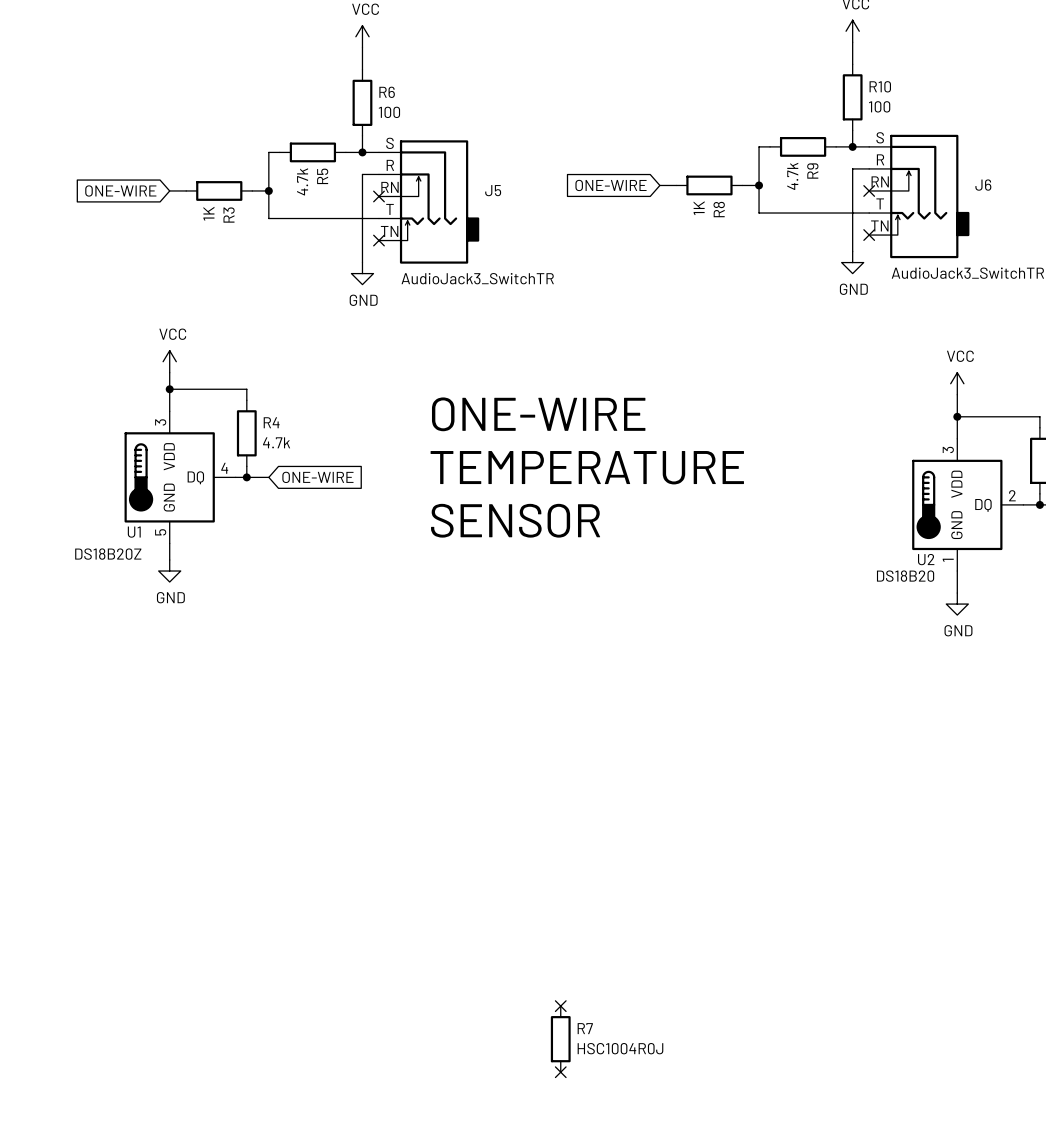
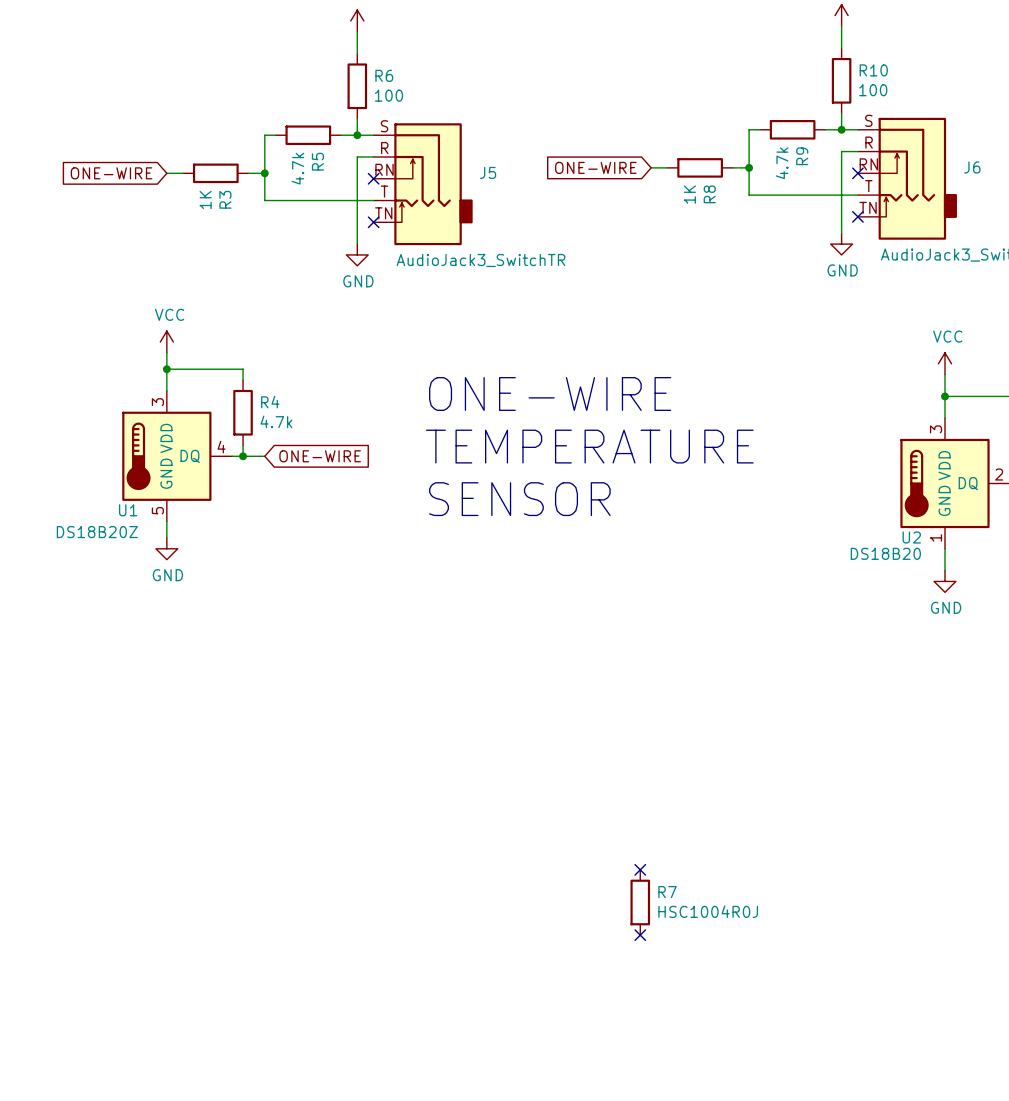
no-connect mark: none -> (640, 869)
no-connect mark: none -> (640, 935)
no-connect mark: (560, 1006) -> none
R7 position: (560, 1039) -> (640, 902)
no-connect mark: (560, 1072) -> none

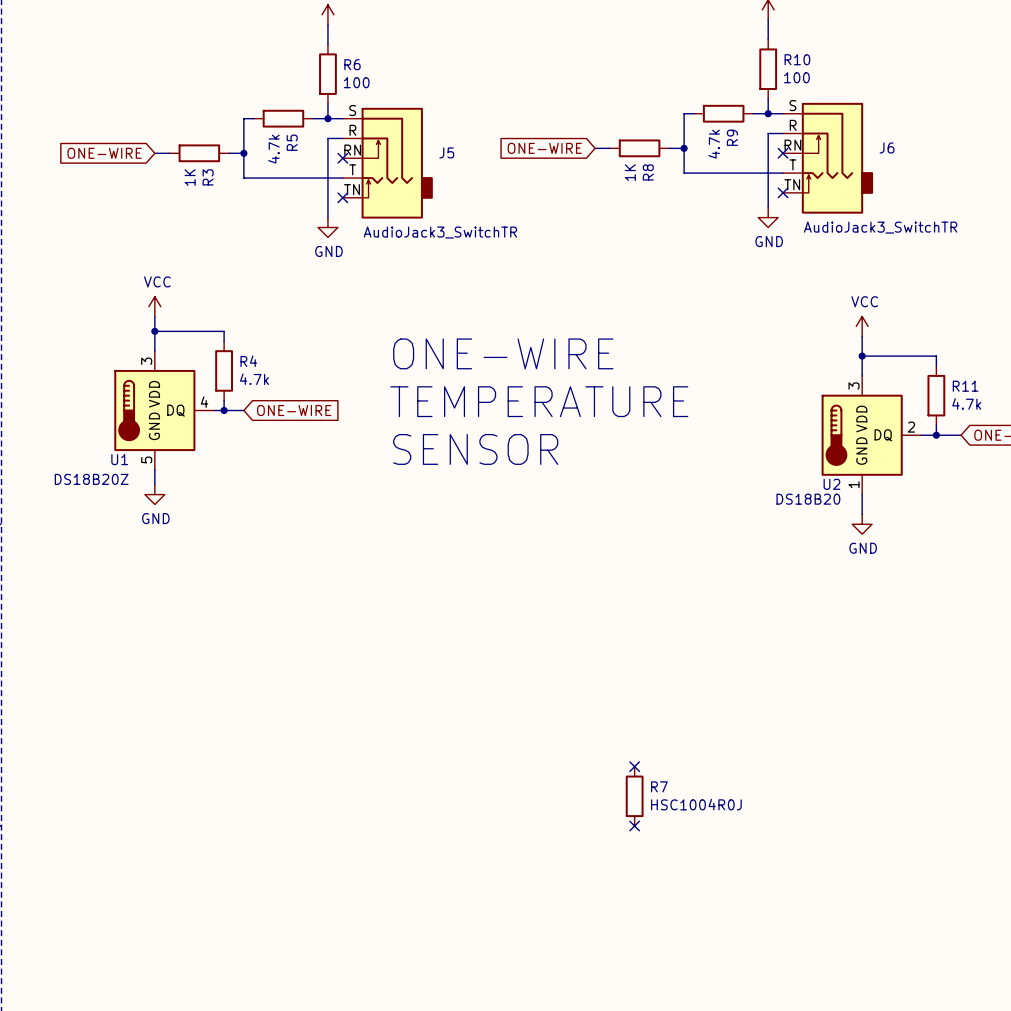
no-connect mark: none -> (634, 766)
no-connect mark: (640, 869) -> none
R7 position: (640, 902) -> (634, 796)
no-connect mark: none -> (634, 826)
no-connect mark: (640, 935) -> none

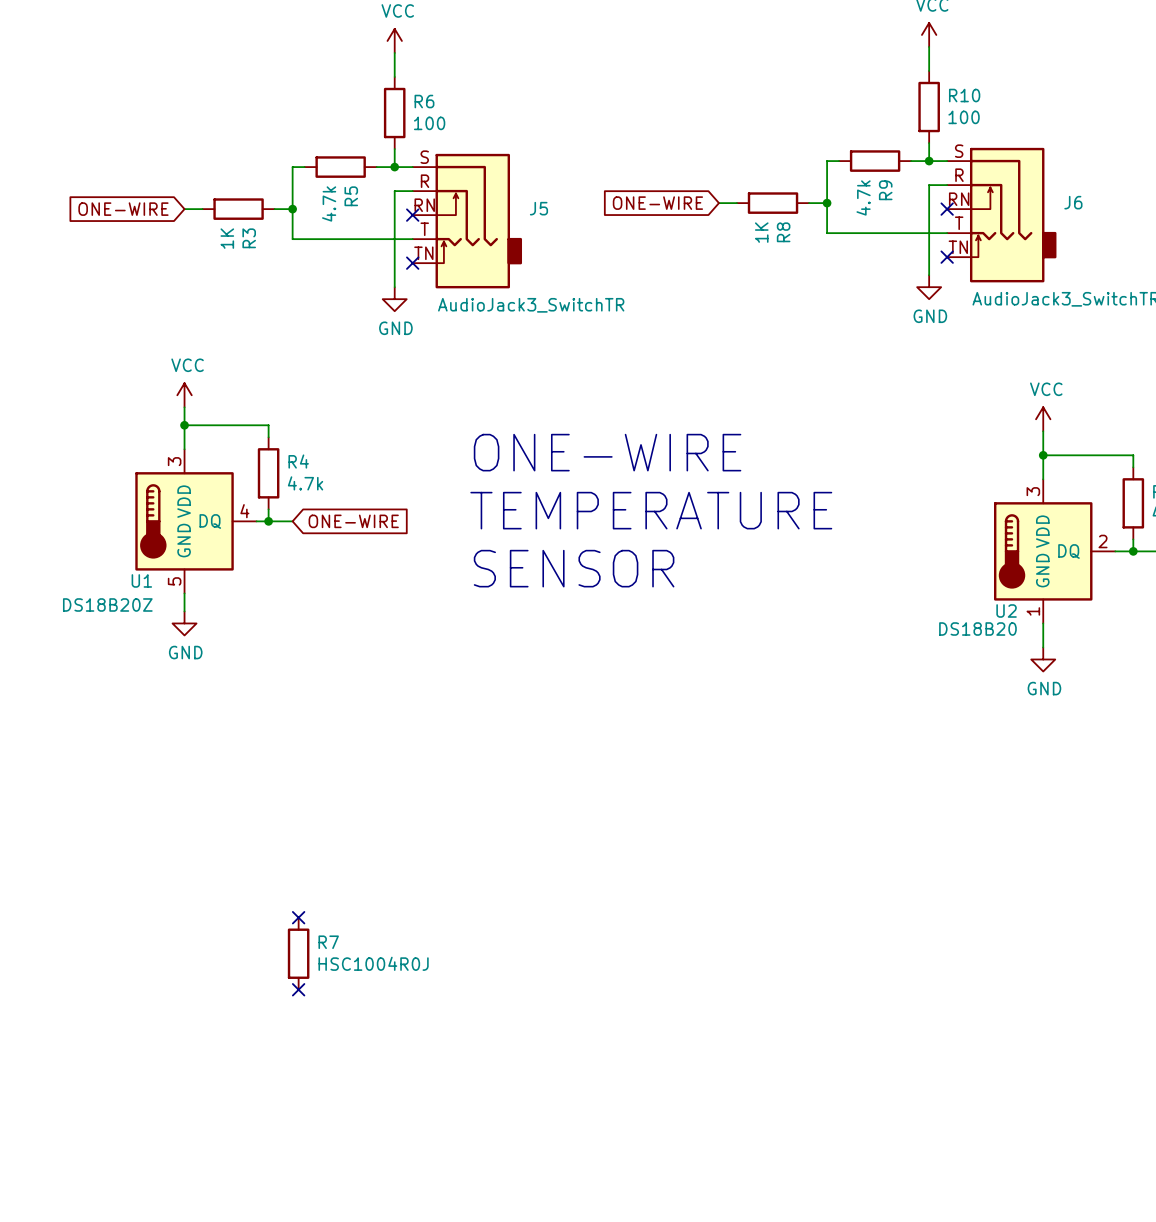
no-connect mark: none -> (298, 917)
no-connect mark: (634, 766) -> none
no-connect mark: none -> (298, 989)
R7 position: (634, 796) -> (298, 953)
no-connect mark: (634, 826) -> none

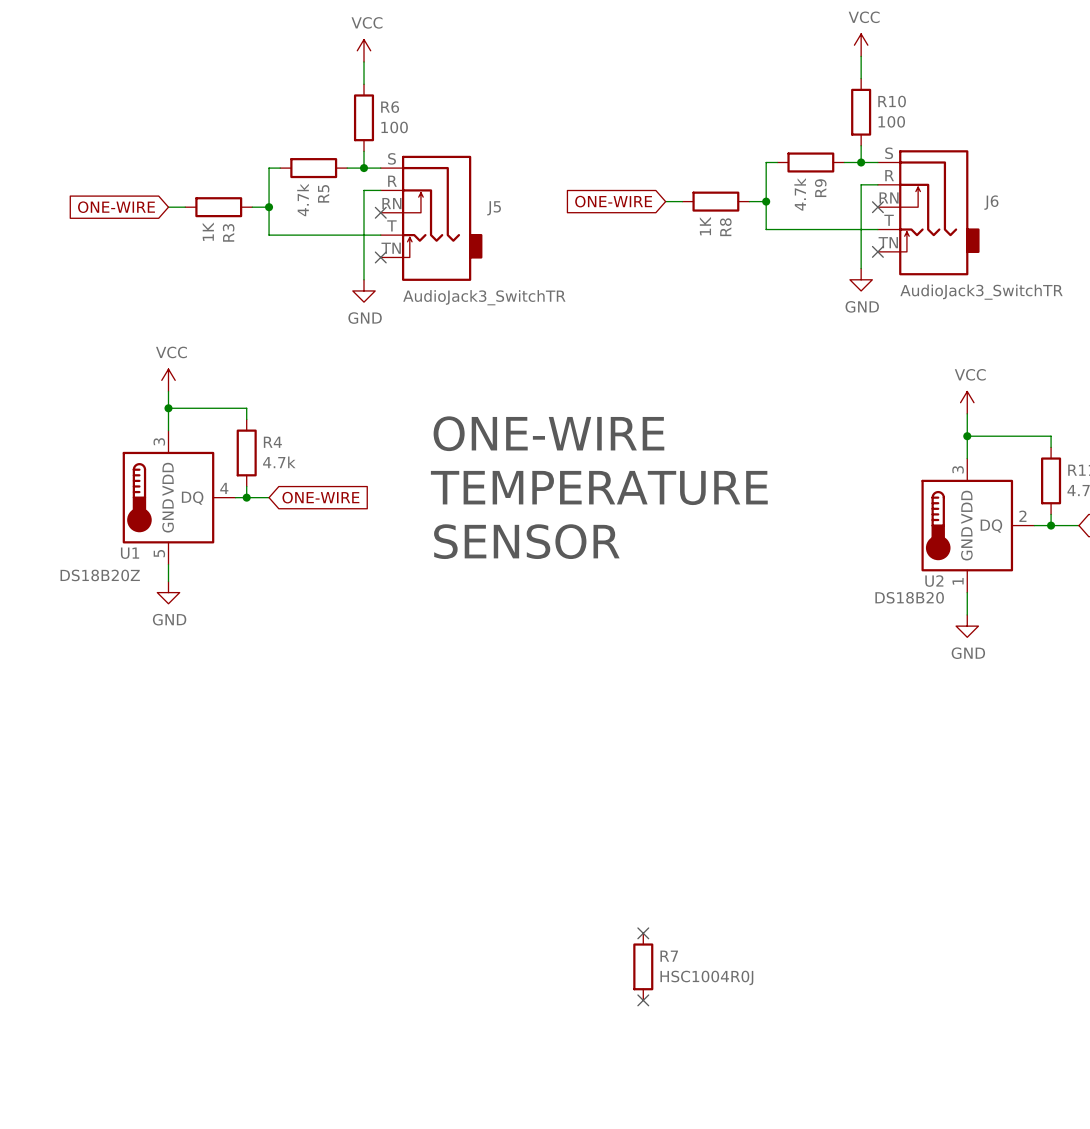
no-connect mark: (298, 917) -> none
R7 position: (298, 953) -> (643, 966)
no-connect mark: (298, 989) -> none
no-connect mark: none -> (643, 933)
no-connect mark: none -> (643, 1000)

